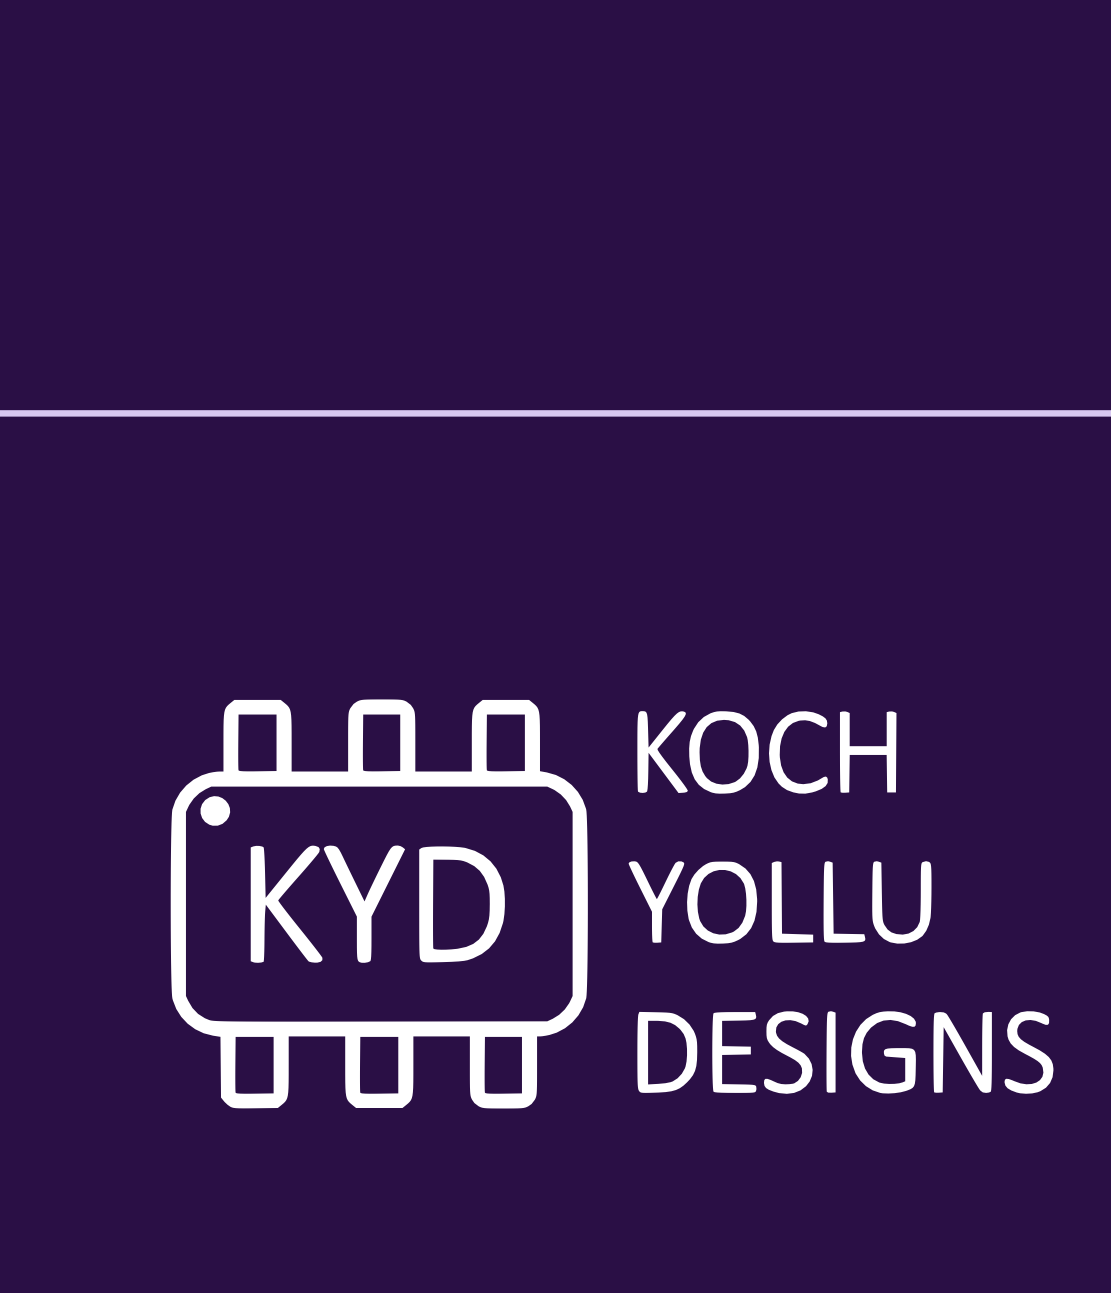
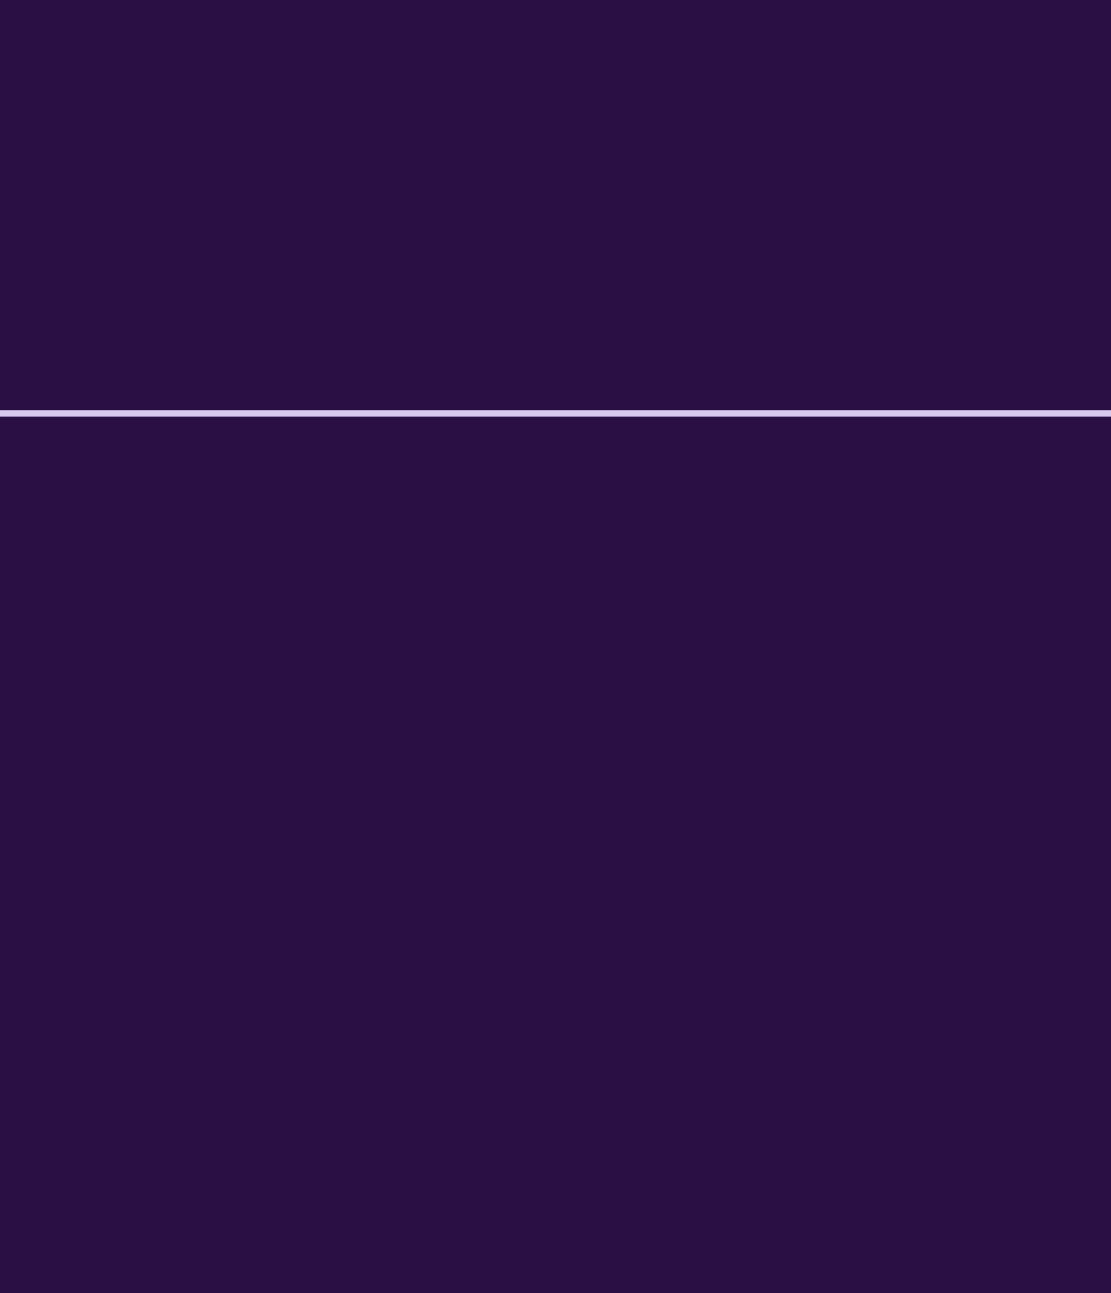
drawing: [170, 699, 1054, 1109] -> none

